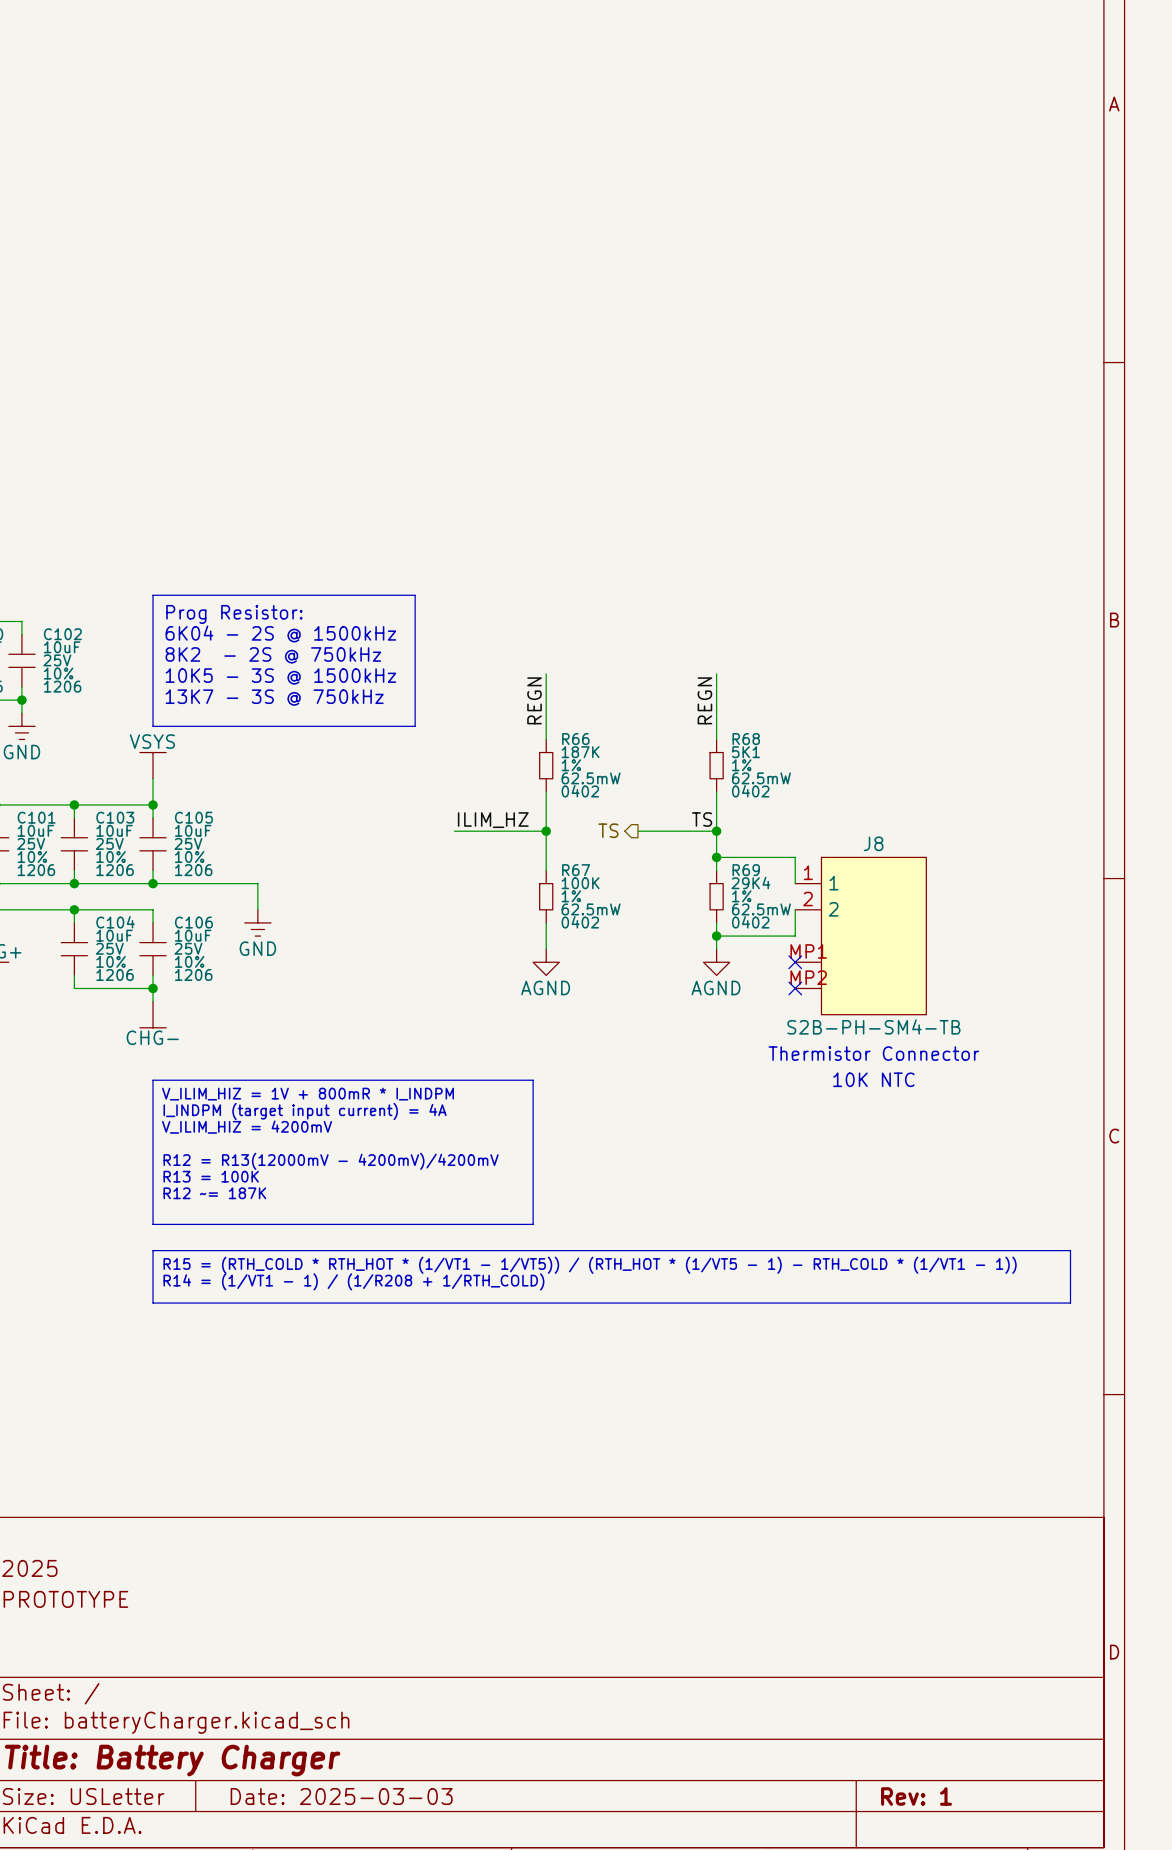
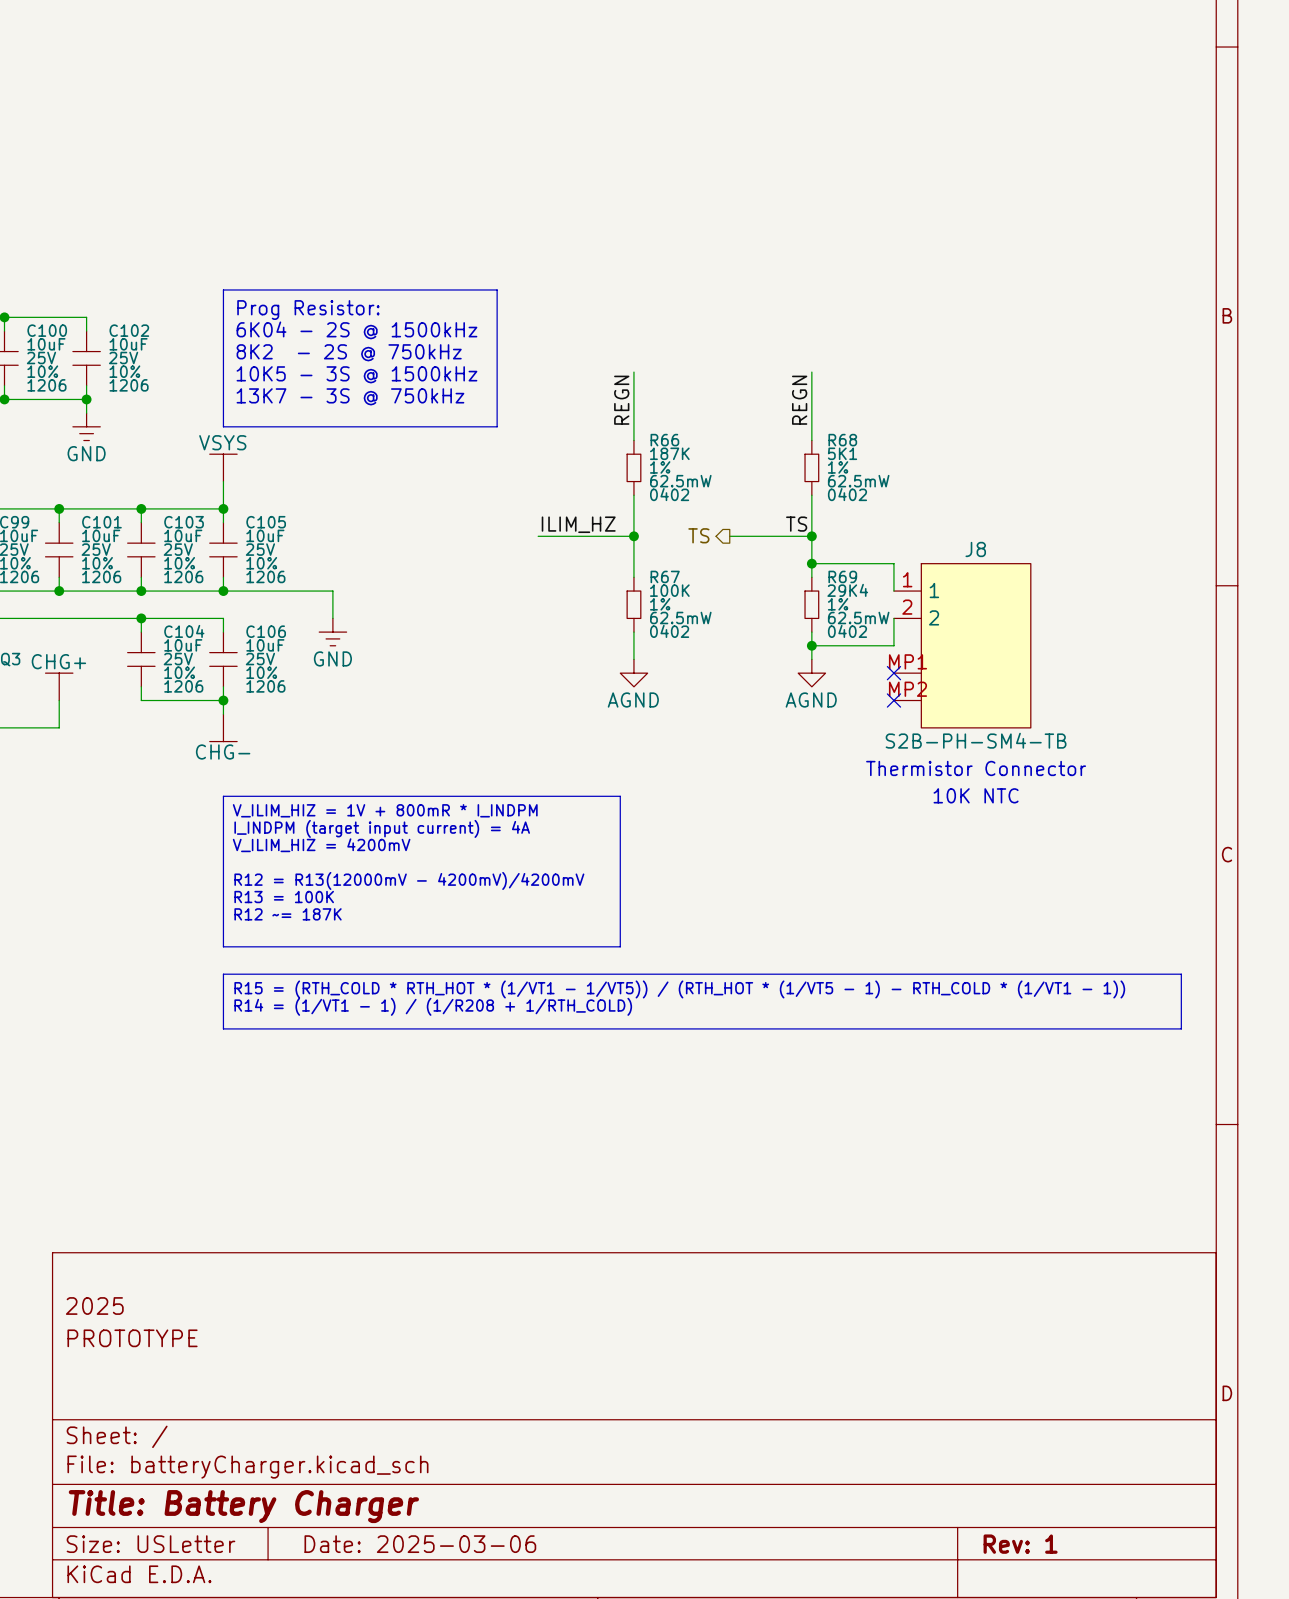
title block: Date: 2025-03-03 (341, 1796) -> Date: 2025-03-06 (420, 1544)

